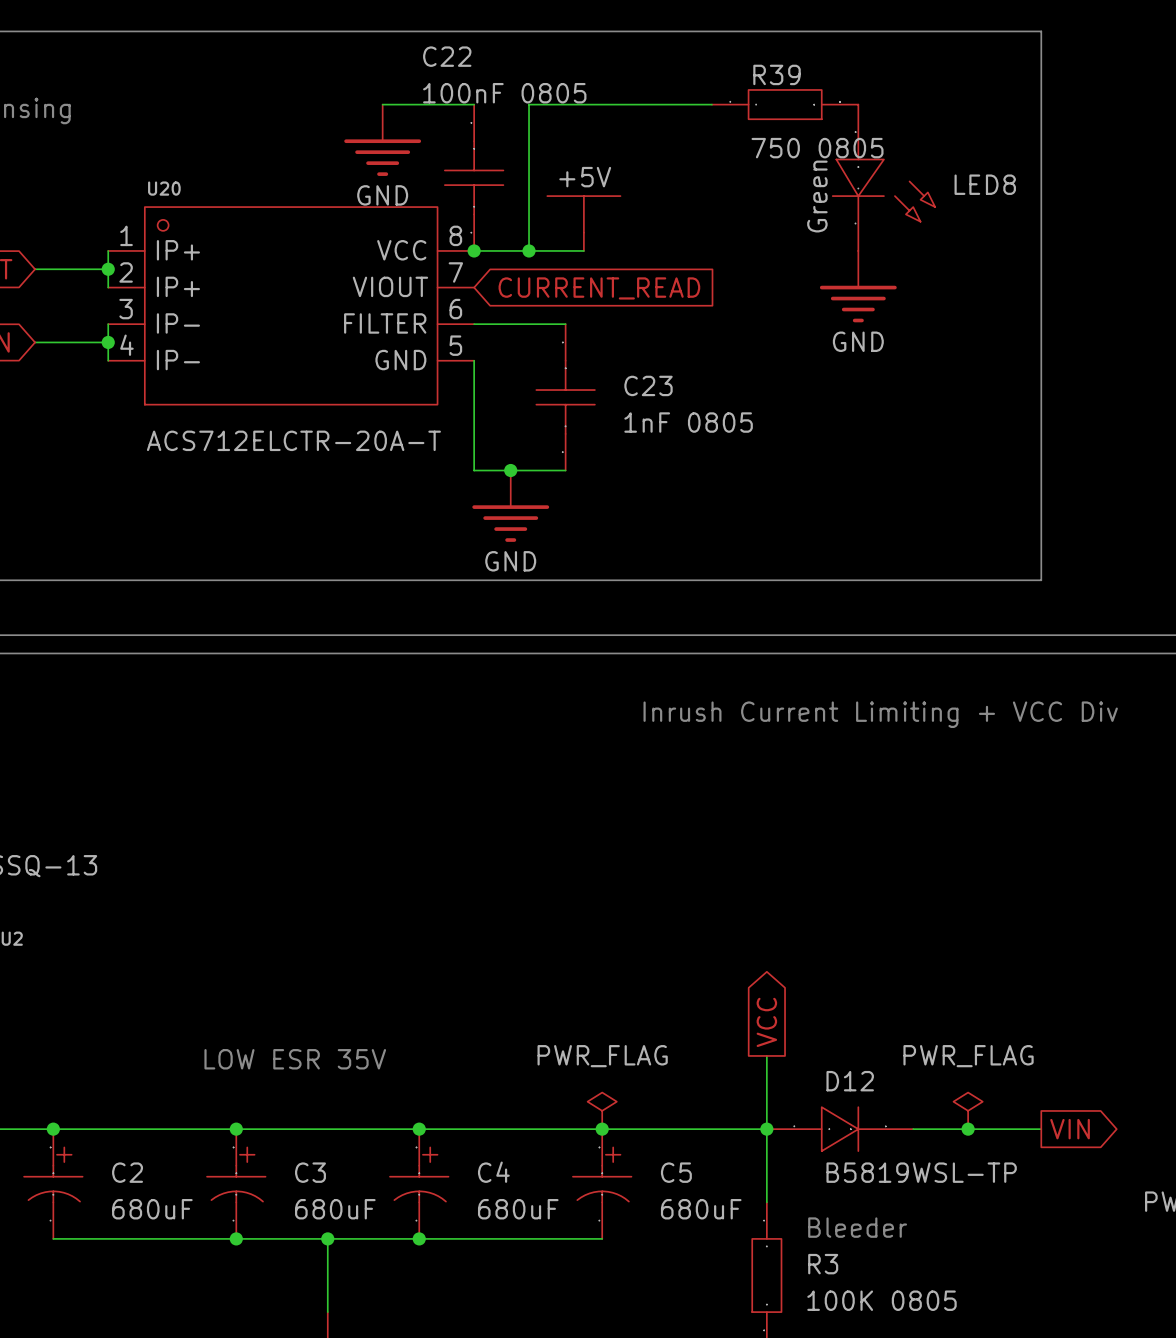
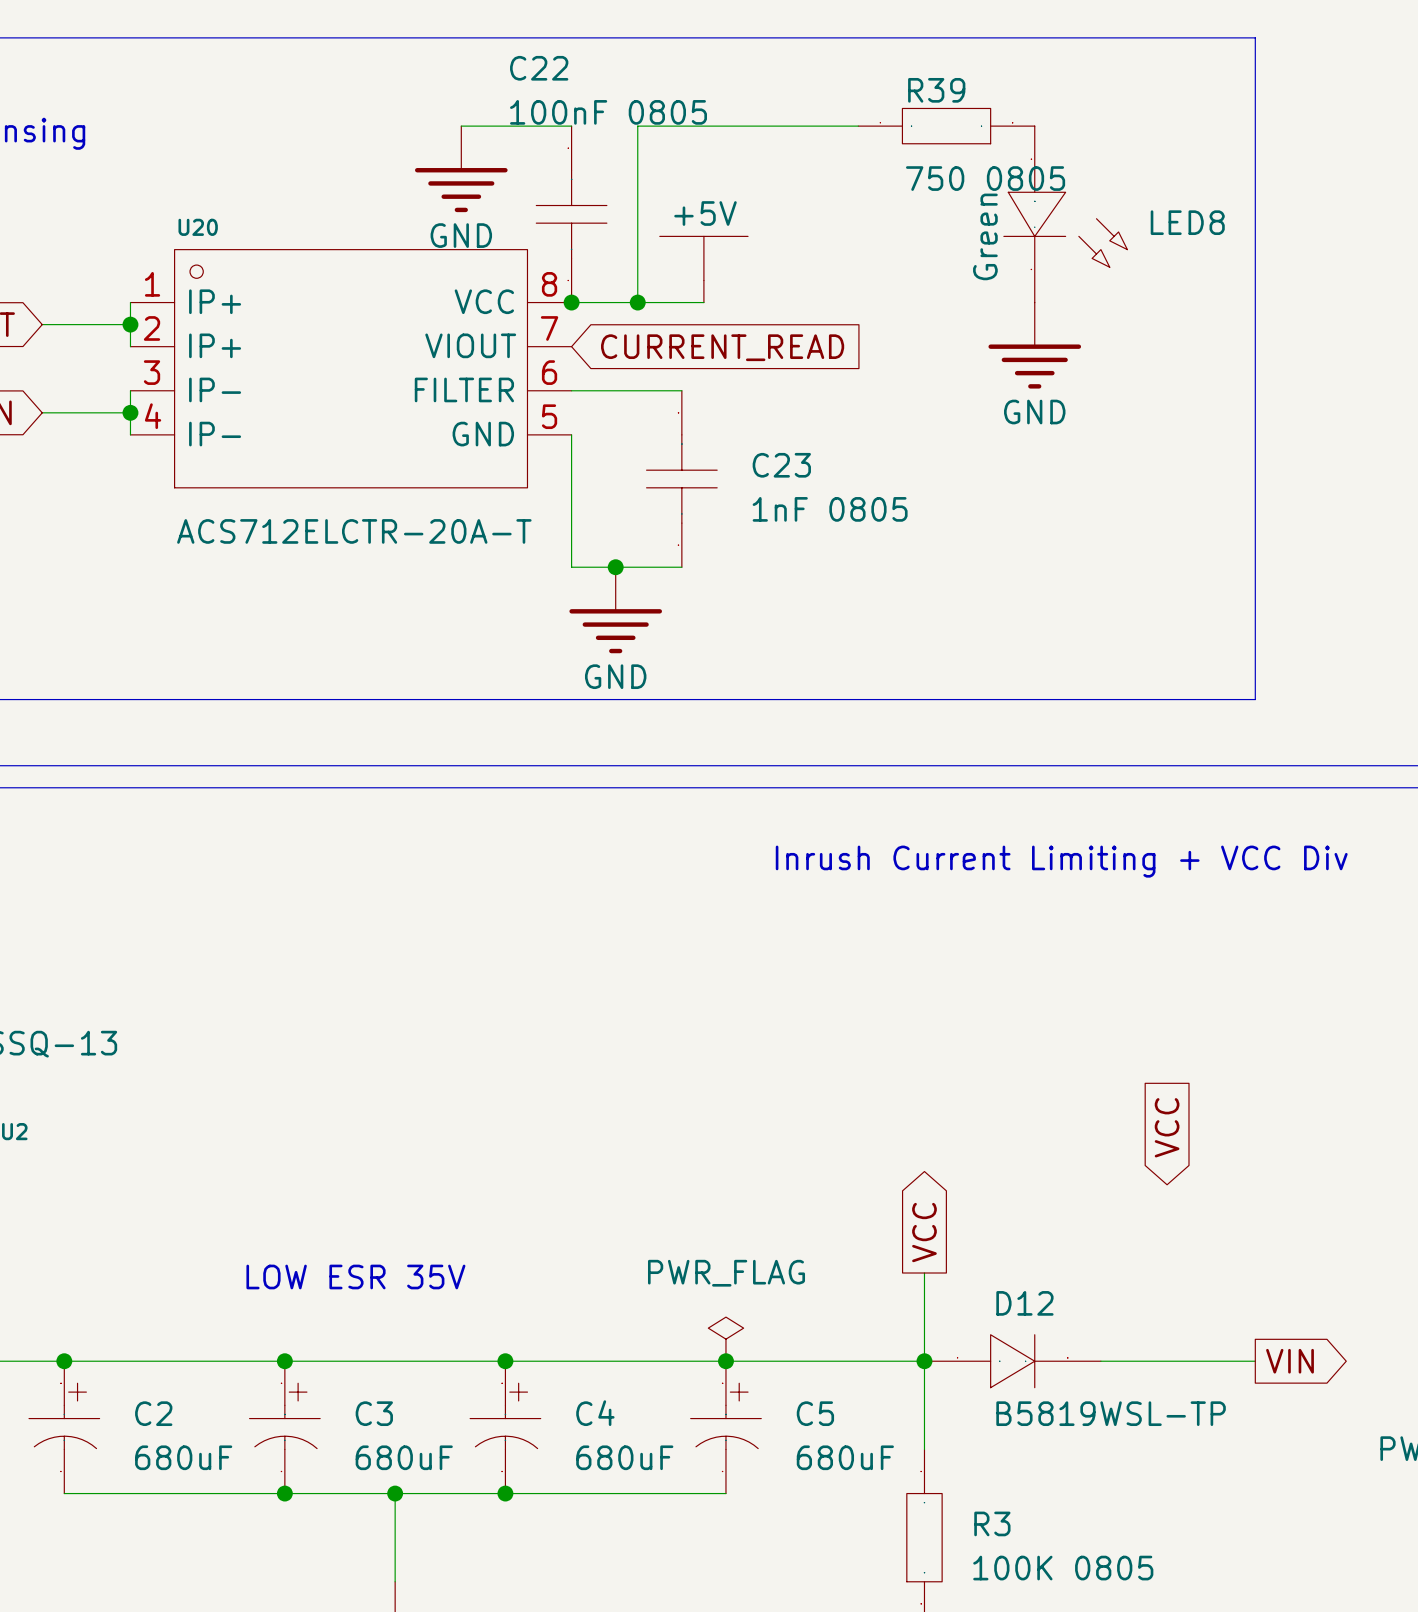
global label: none -> VCC (1167, 1127)
power symbol: PWR_FLAG (968, 1110) -> none
junction: (968, 1129) -> none
text: Bleeder (857, 1227) -> none

